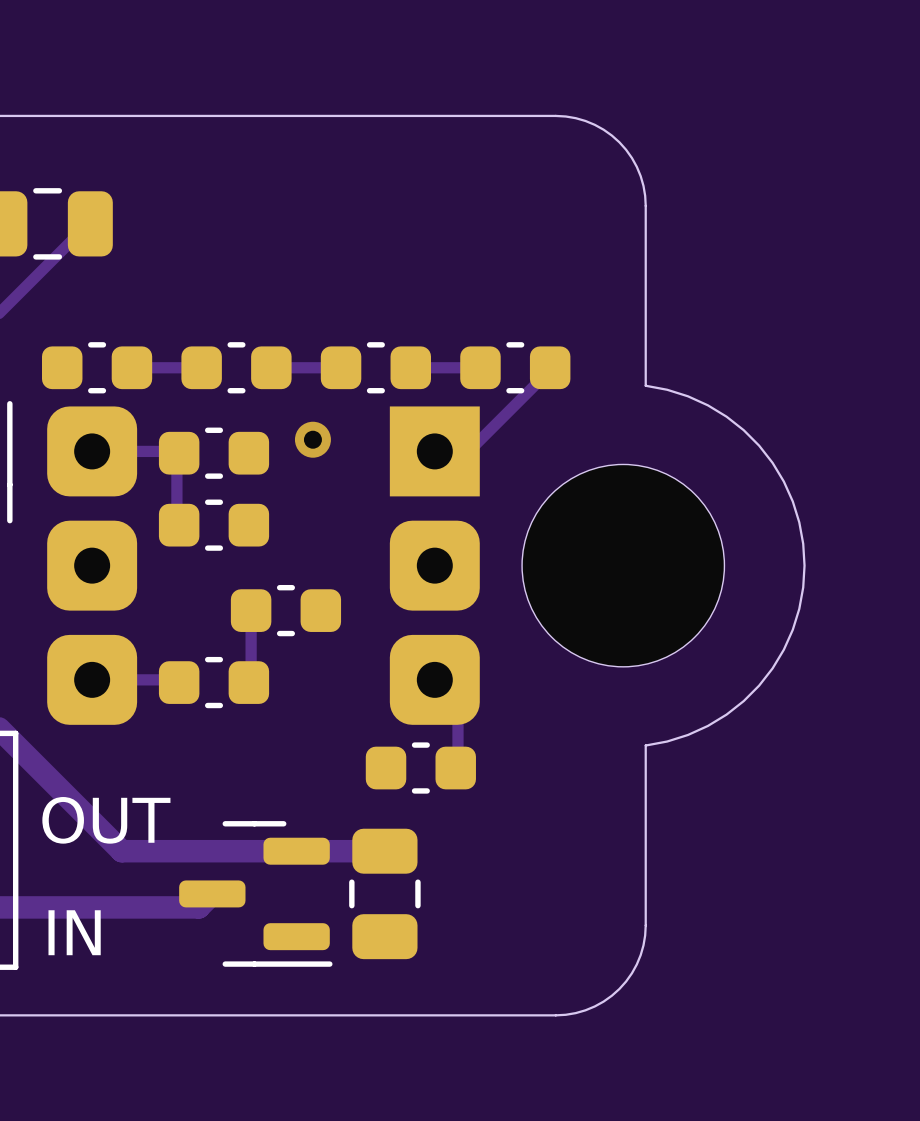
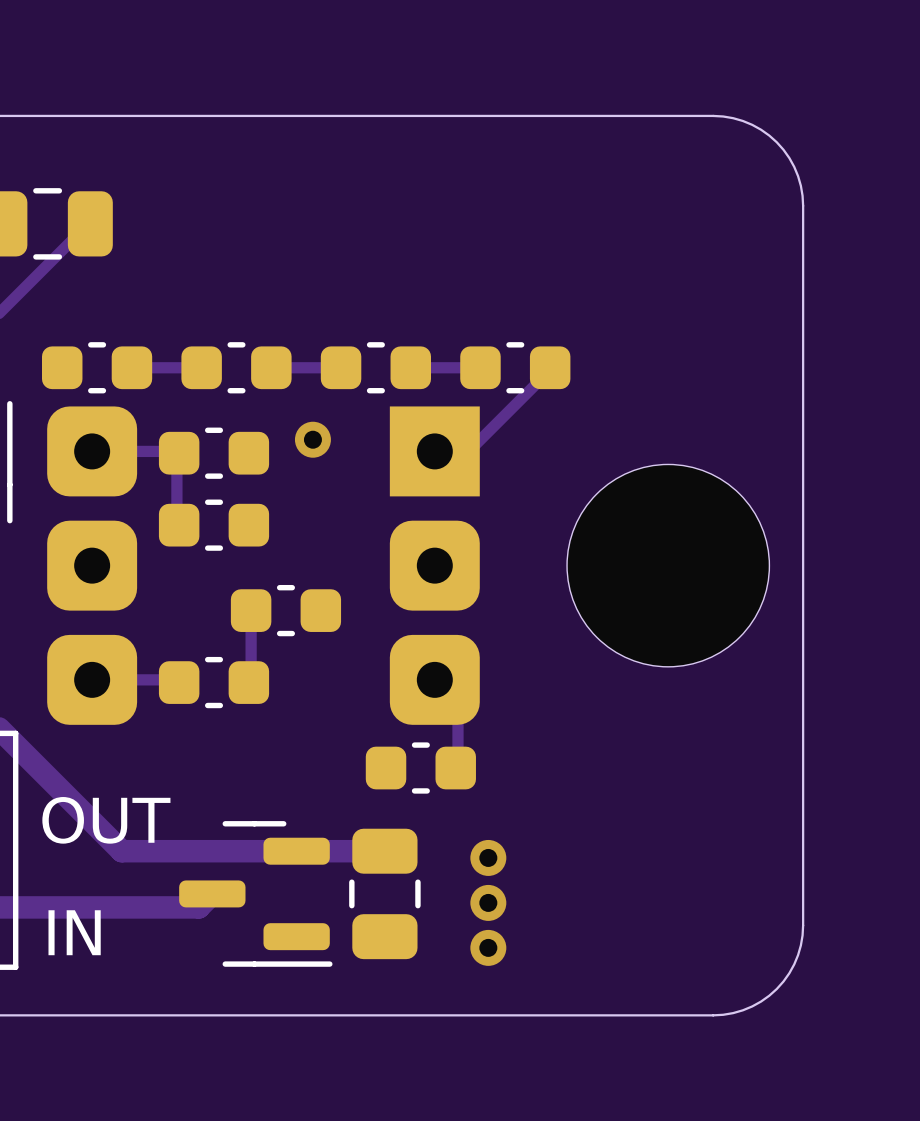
board edge: (555, 115) (585, 120) (611, 135) (626, 149) (640, 176) (645, 205) (645, 385) (667, 389) (707, 405) (726, 416) (759, 445) (772, 462) (792, 501) (803, 543) (804, 565) (799, 608) (792, 629) (783, 649) (759, 685) (743, 701) (707, 725) (667, 741) (645, 745) (645, 925) (640, 955) (626, 981) (611, 995) (585, 1010) (555, 1015) -> (555, 115) (713, 115) (742, 120) (769, 135) (789, 158) (798, 176) (803, 205) (803, 925) (798, 955) (789, 973) (776, 989) (752, 1006) (733, 1013) (713, 1015) (555, 1015)
part position: (623, 565) -> (668, 565)
via: none -> (488, 857)
via: none -> (488, 902)
via: none -> (488, 947)

